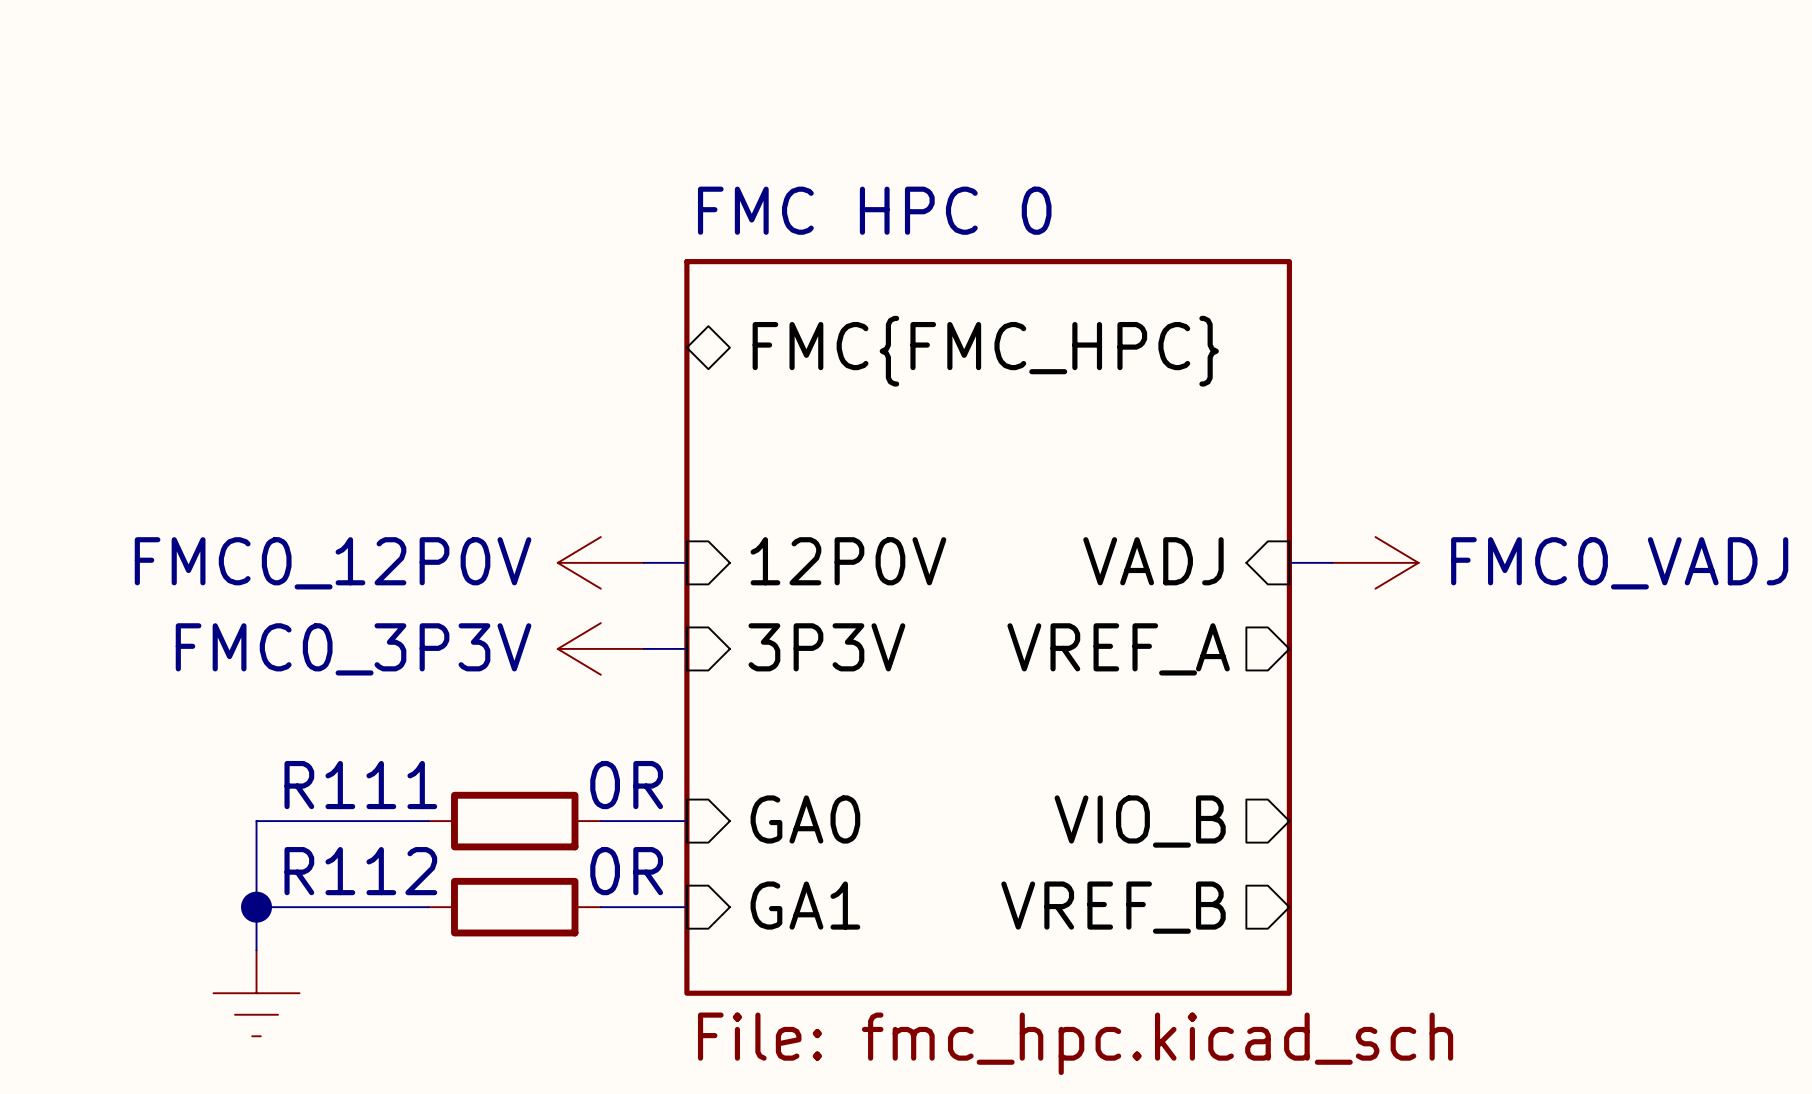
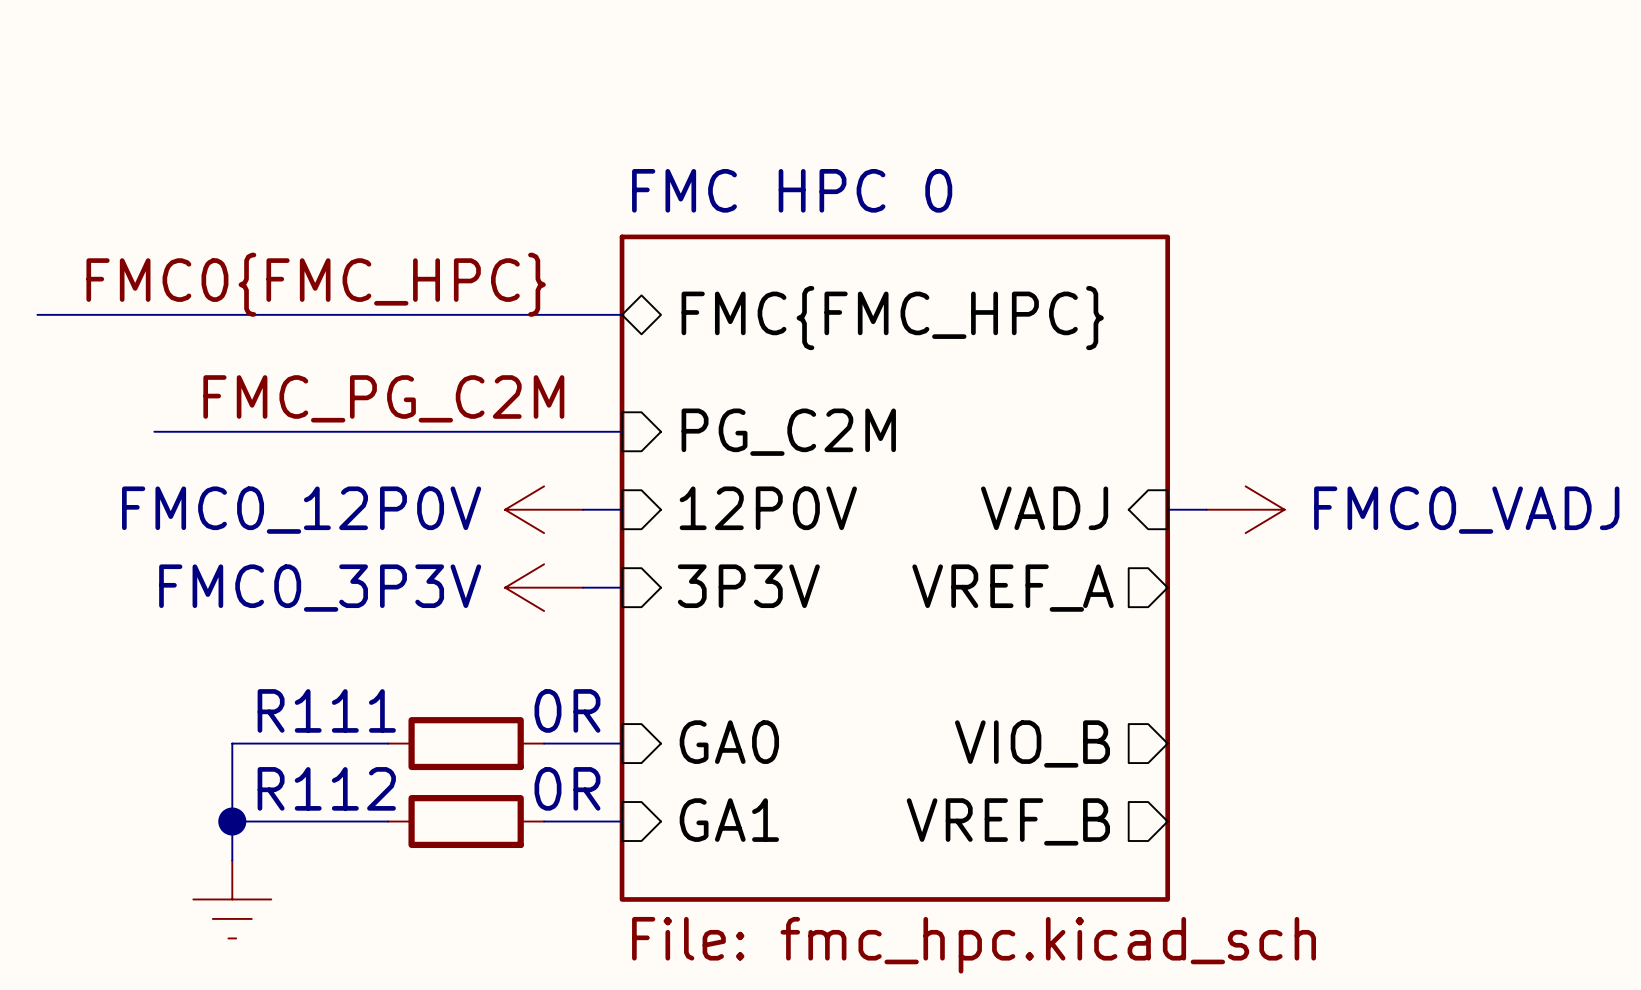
label: none -> FMC0{FMC_HPC} (316, 284)
bus: none -> (37, 314) (622, 314)
label: none -> FMC_PG_C2M (383, 398)
wire: none -> (154, 431) (622, 431)
sheet pin: none -> PG_C2M (788, 432)

